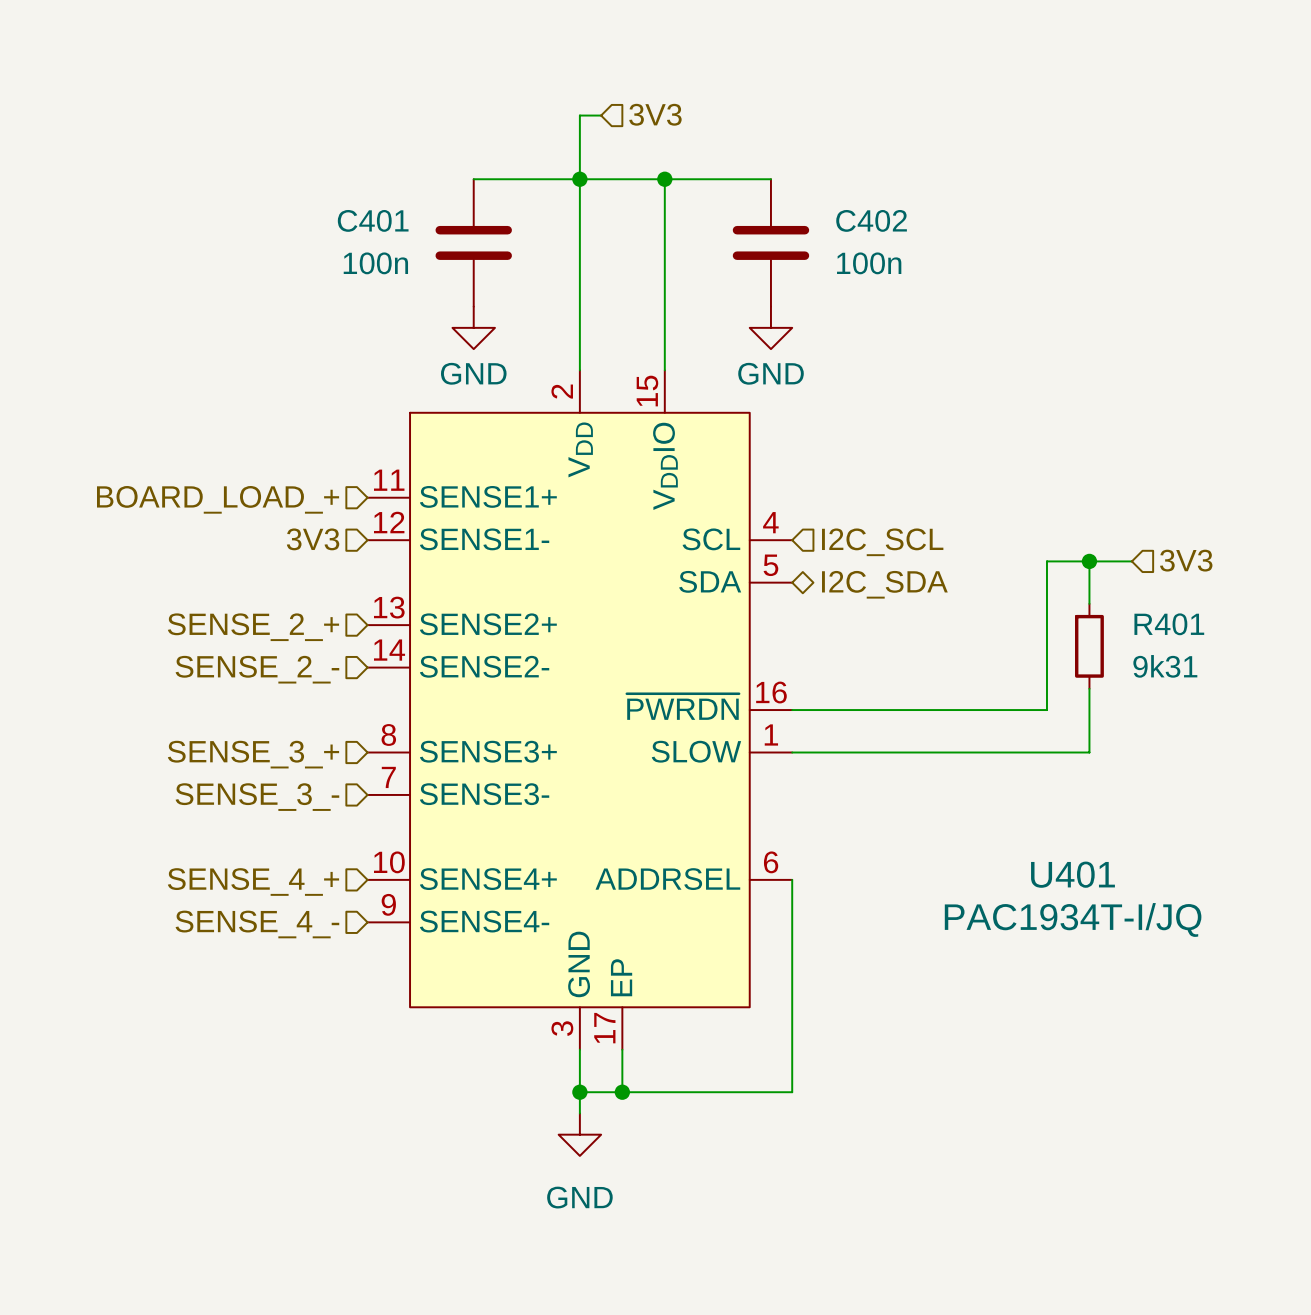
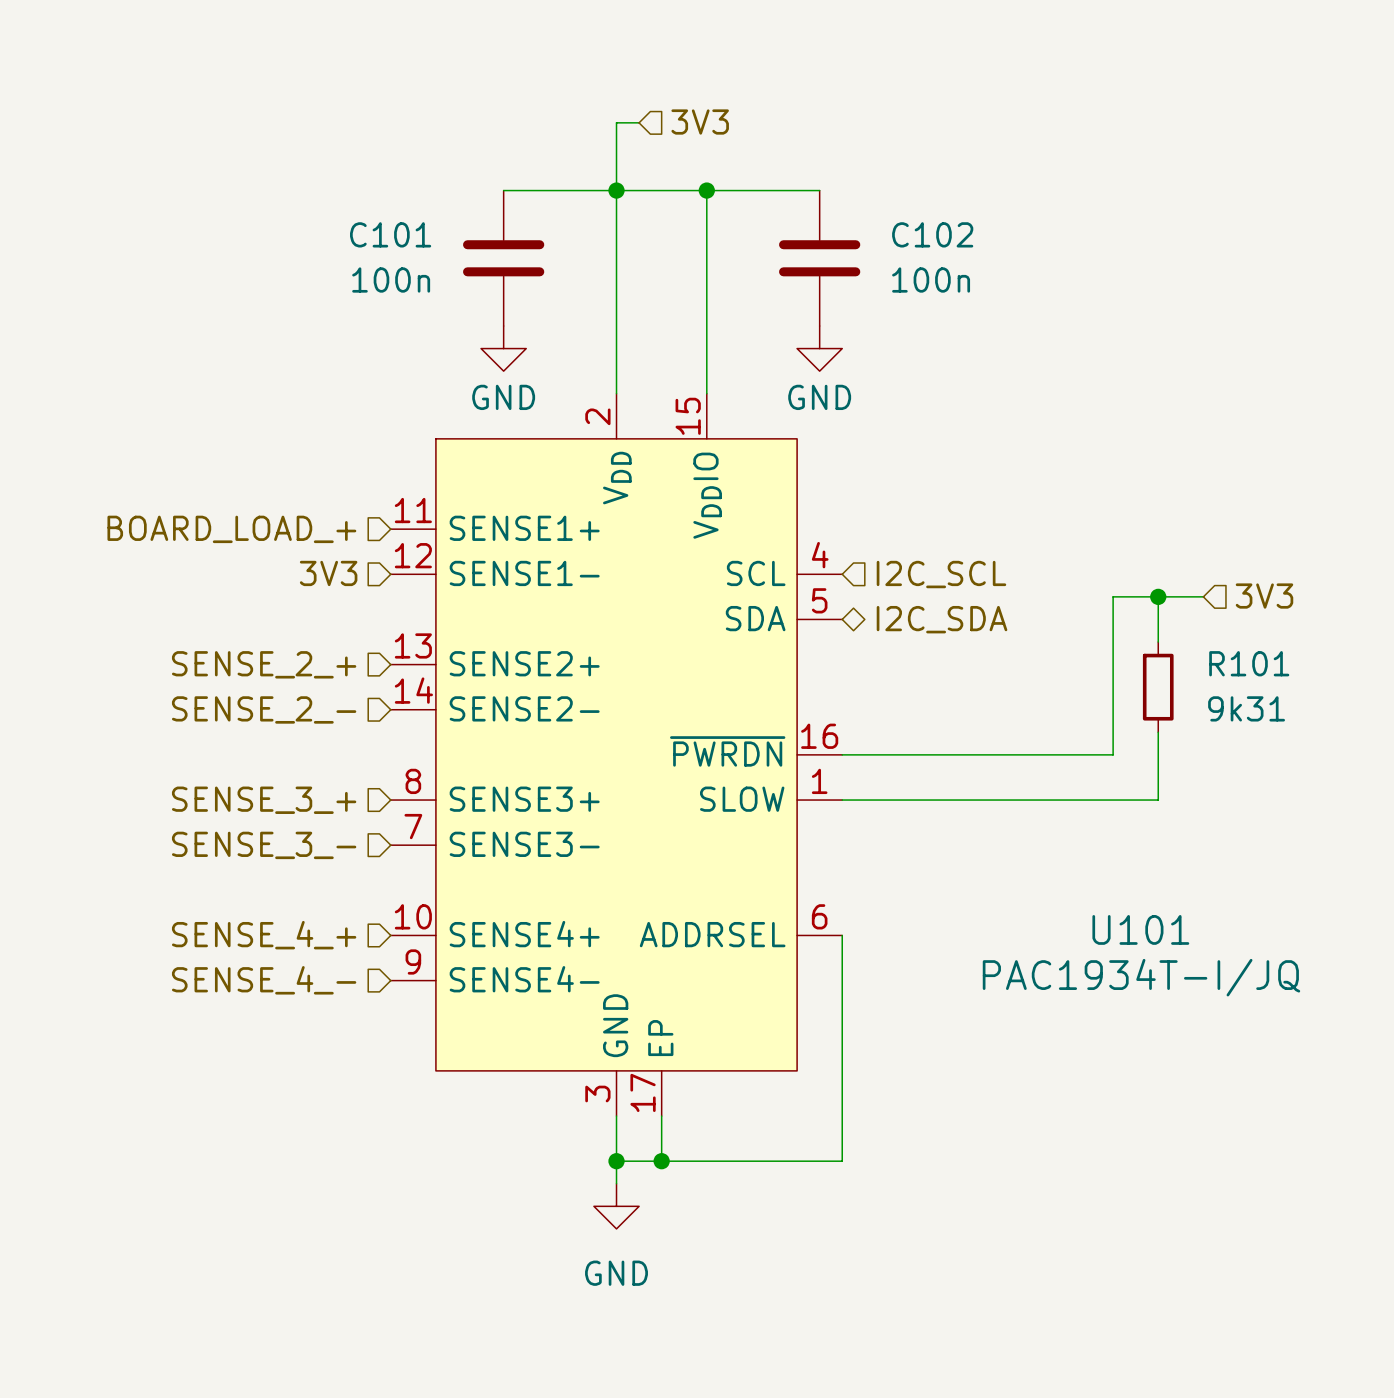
C401 name: C401 (373, 220) -> C101 (390, 234)
C402 name: C402 (871, 220) -> C102 (932, 234)
R401 name: R401 (1169, 624) -> R101 (1249, 663)
U401 name: U401 (1072, 874) -> U101 (1140, 929)

